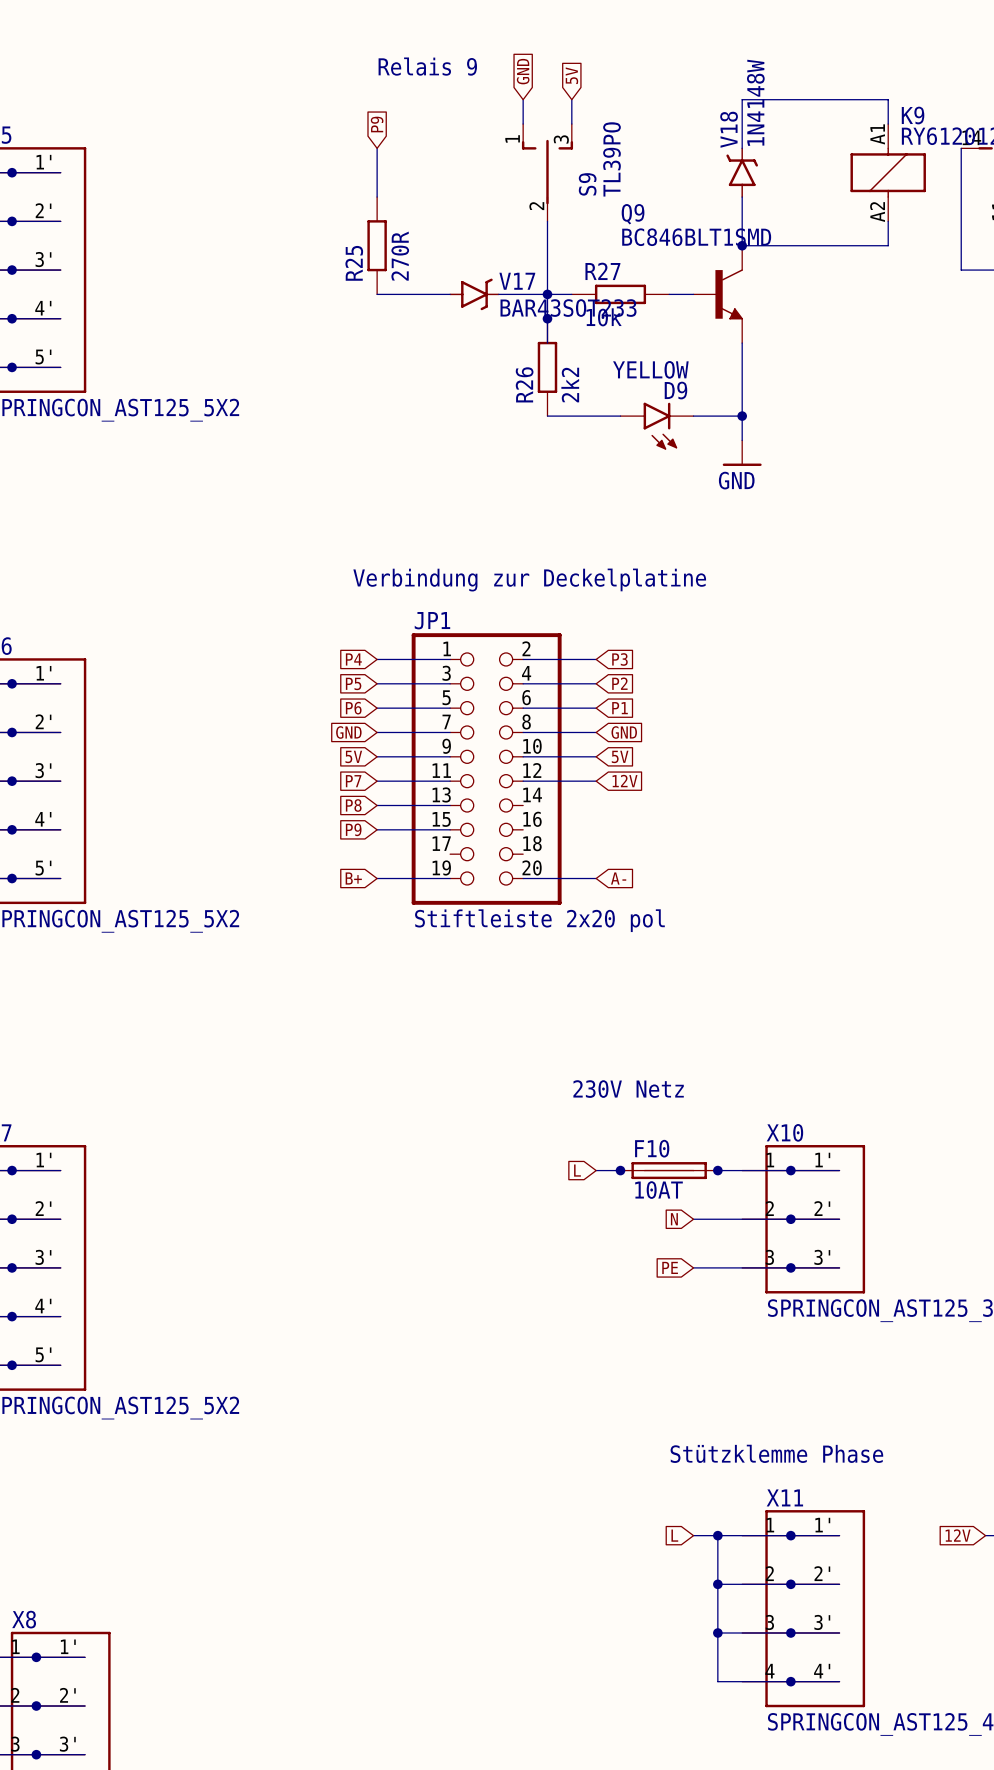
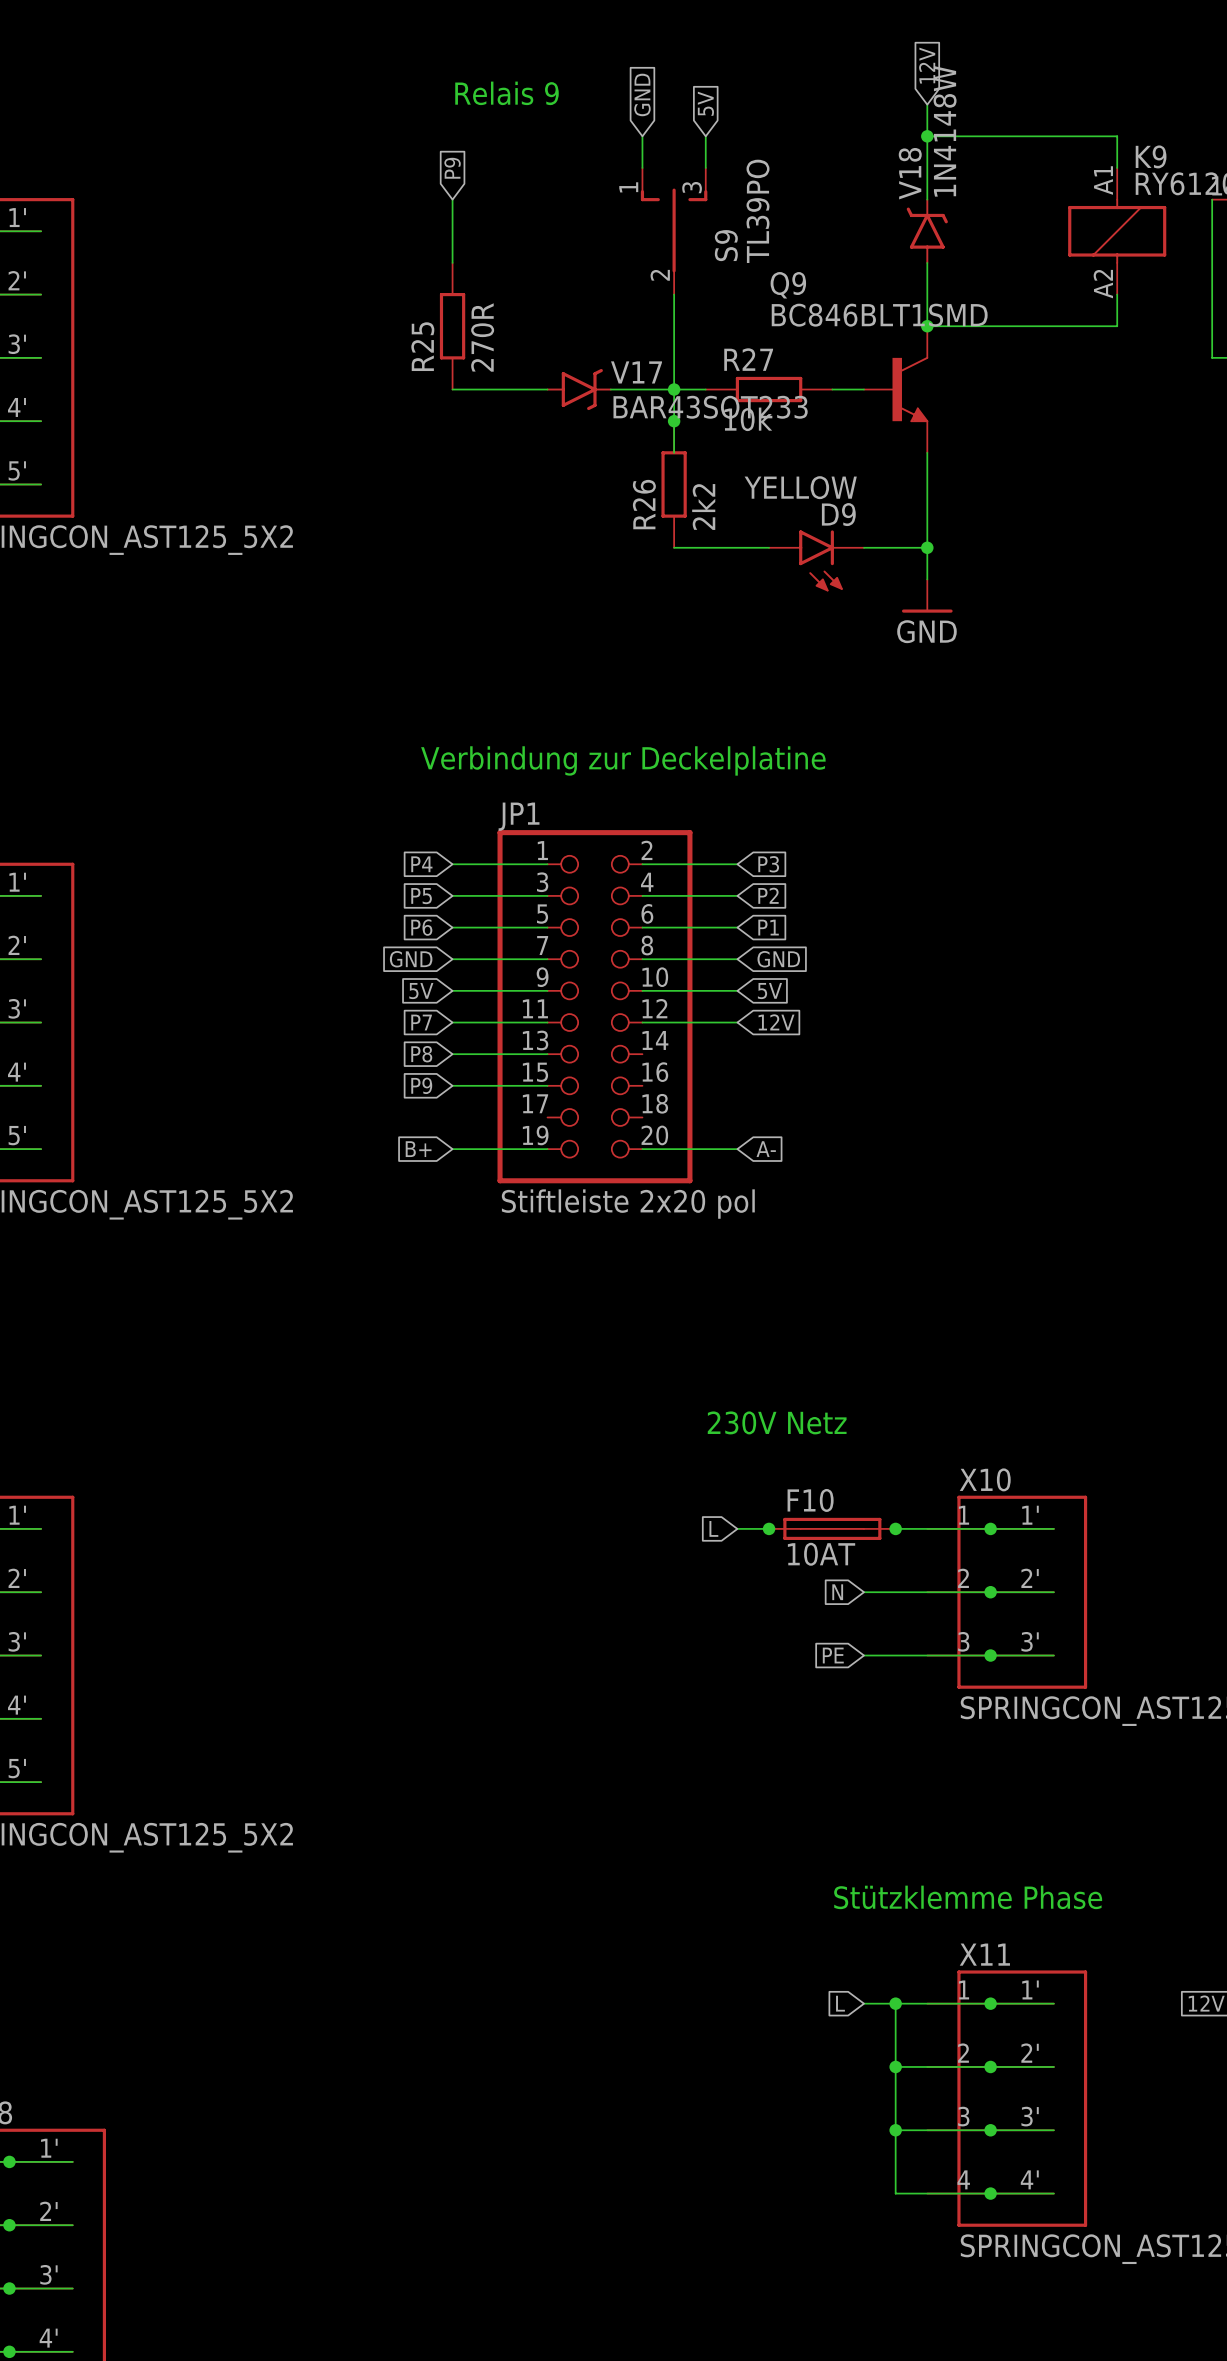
global label: none -> 12V (927, 65)
wire: none -> (927, 104) (927, 136)
junction: none -> (927, 136)

